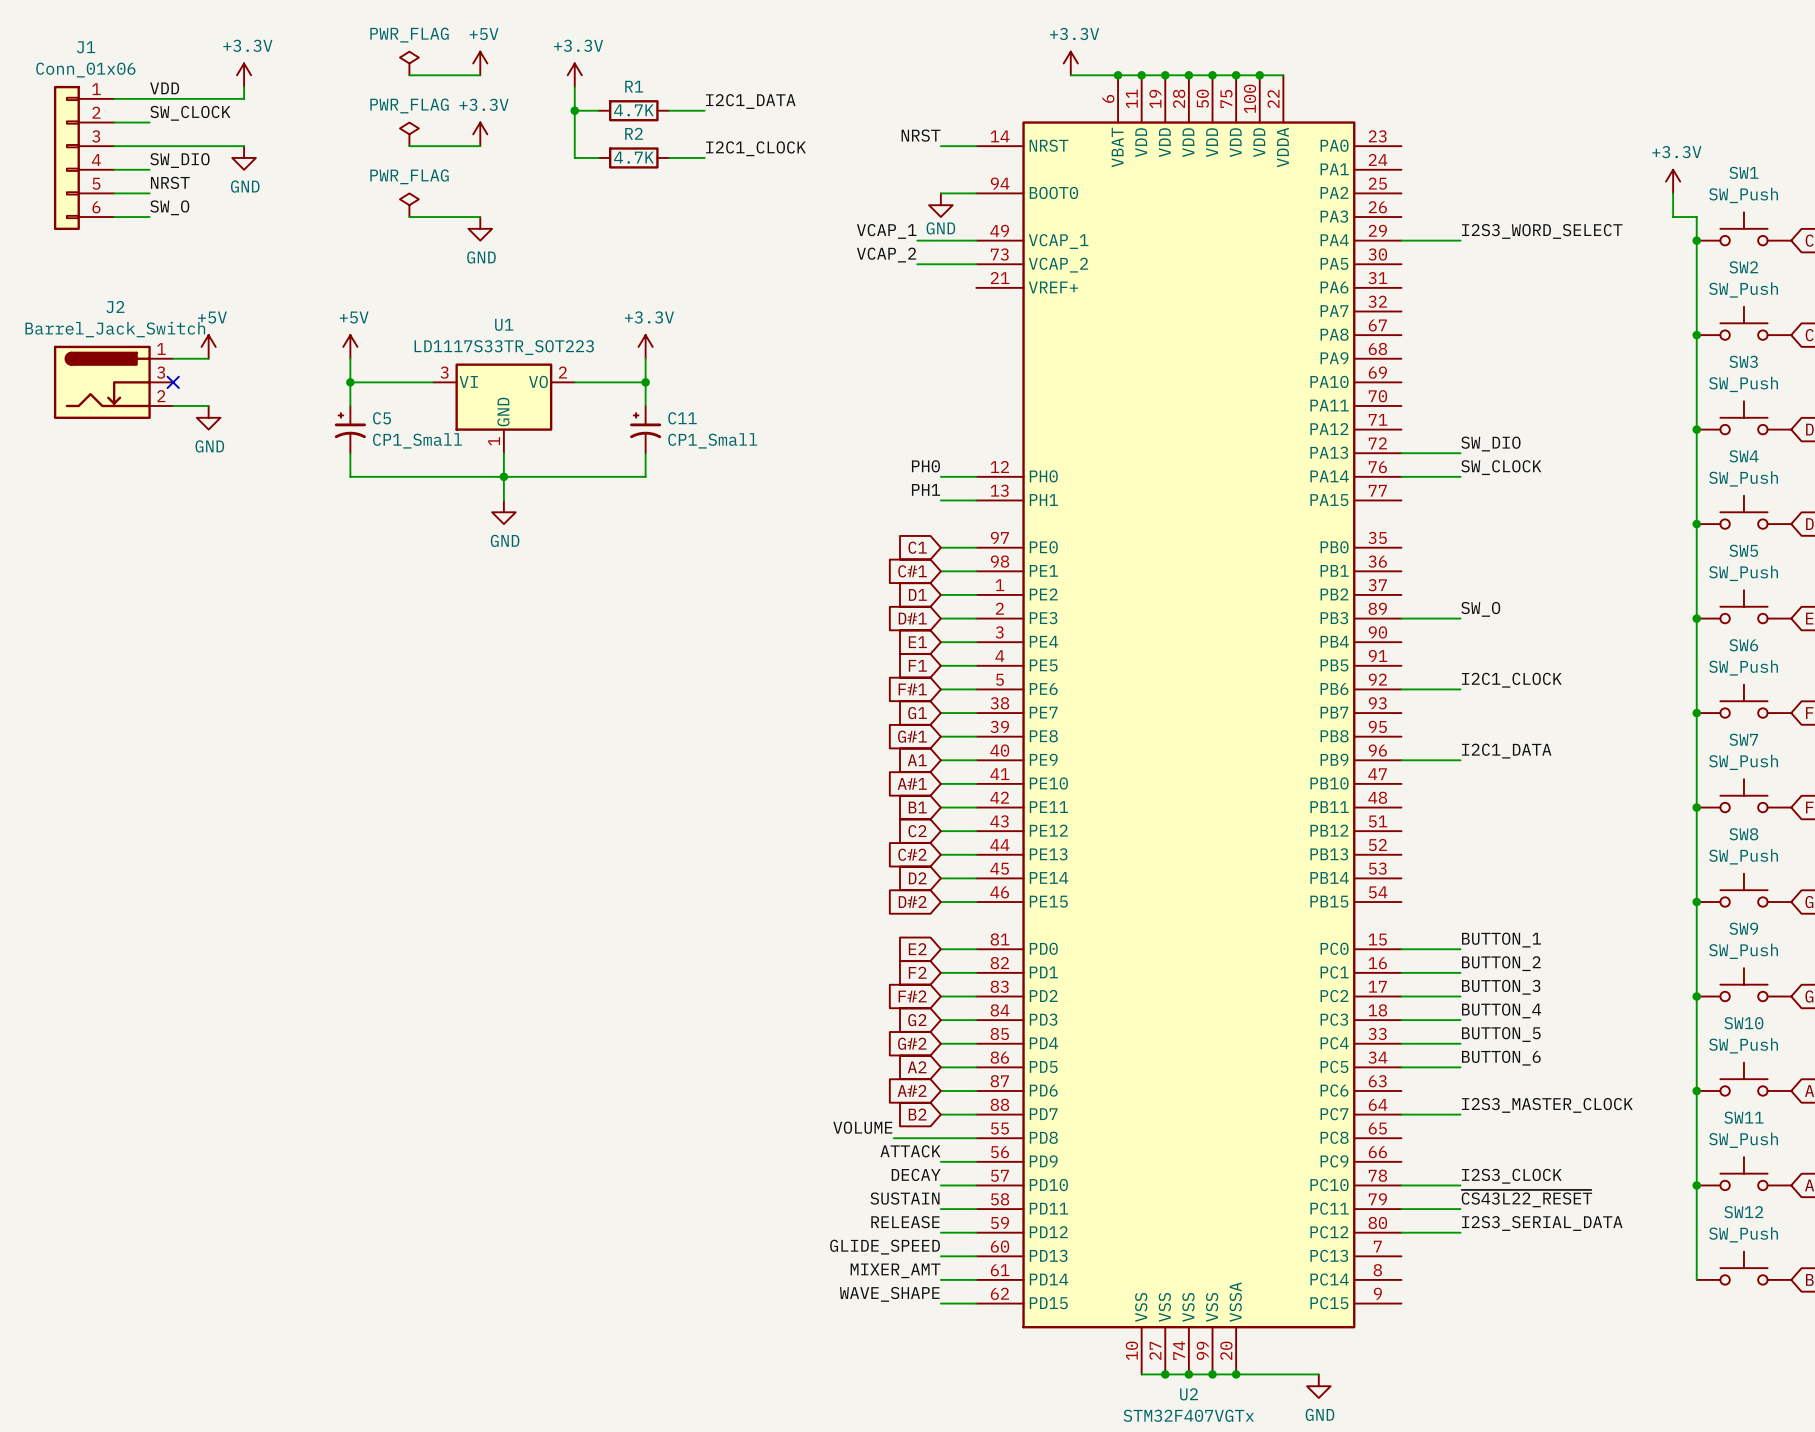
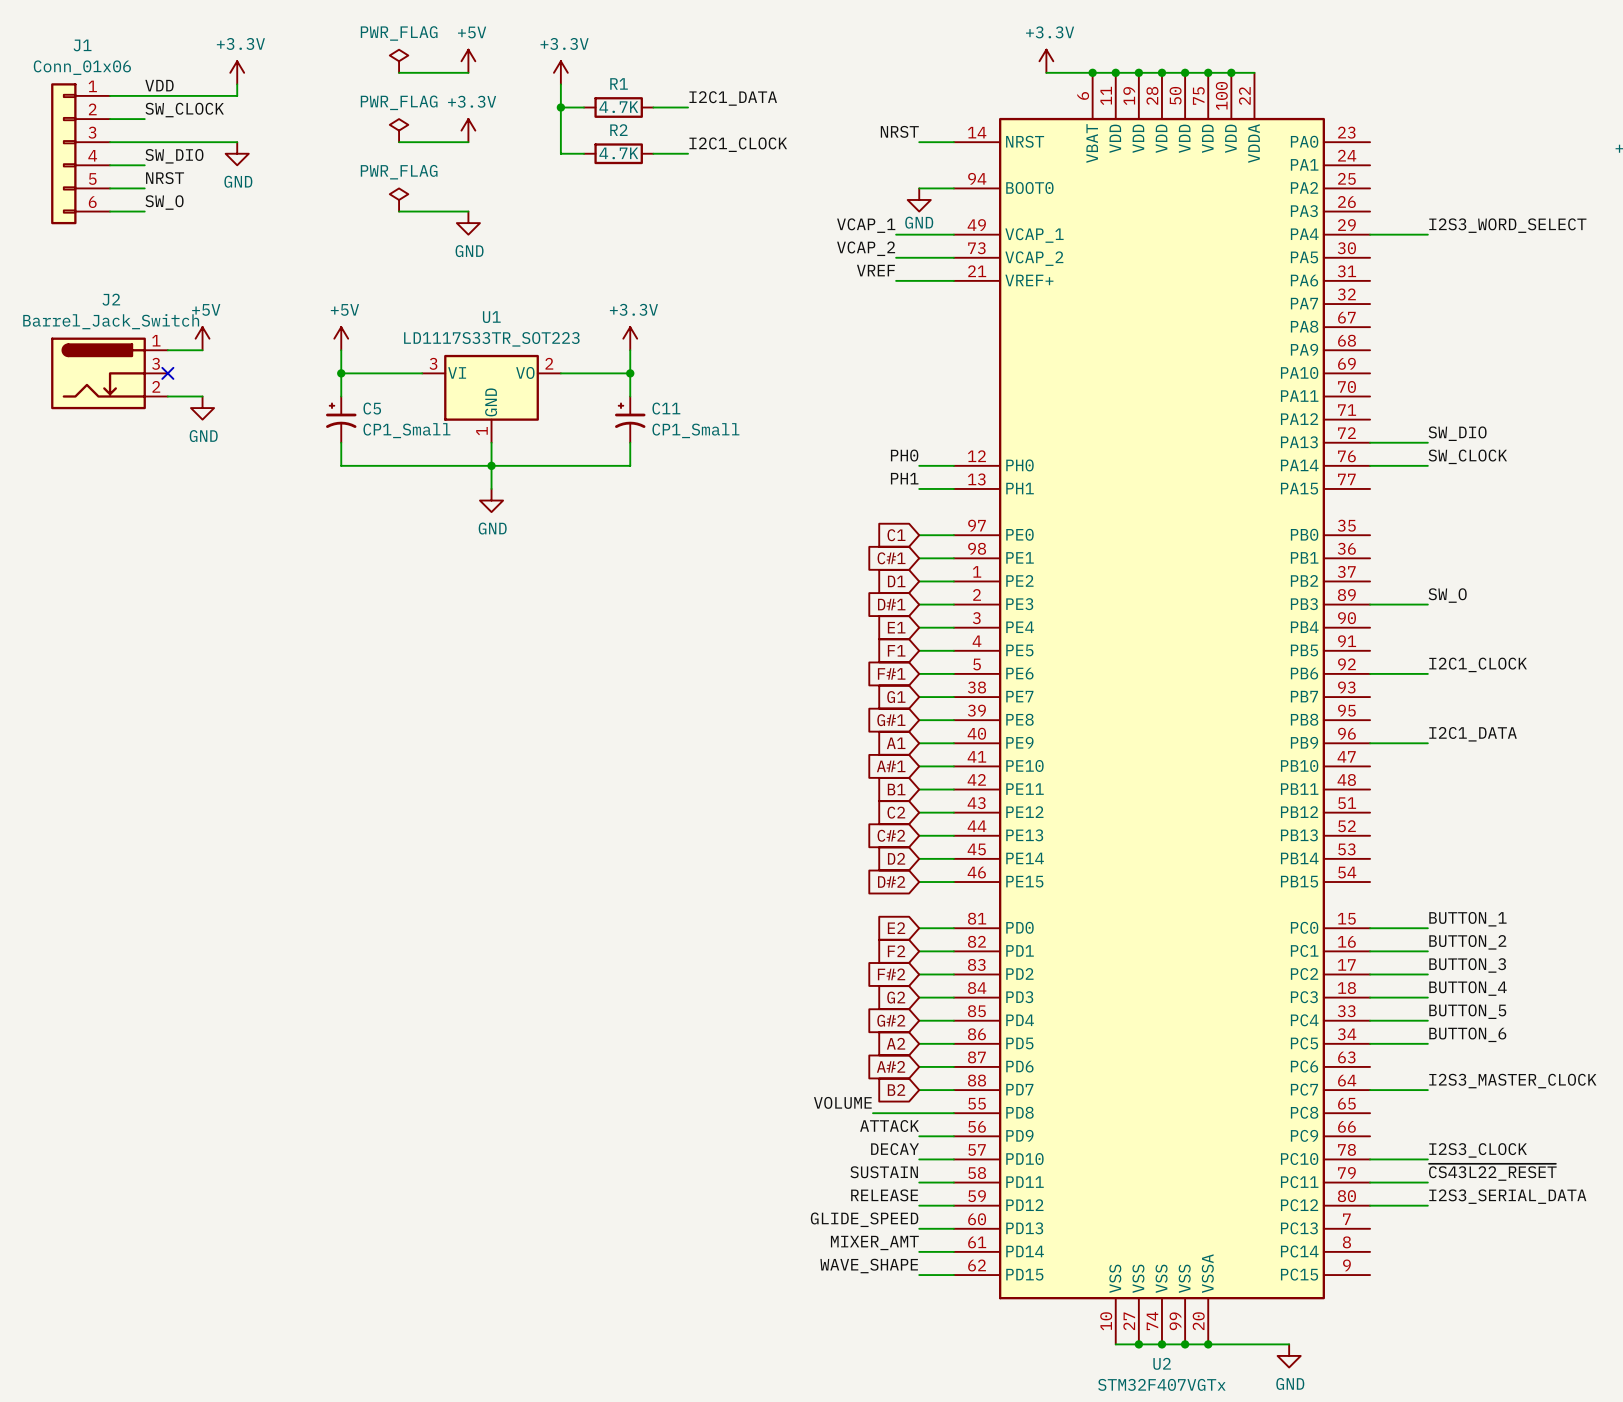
label: none -> VREF (875, 270)
wire: none -> (896, 280) (953, 280)

